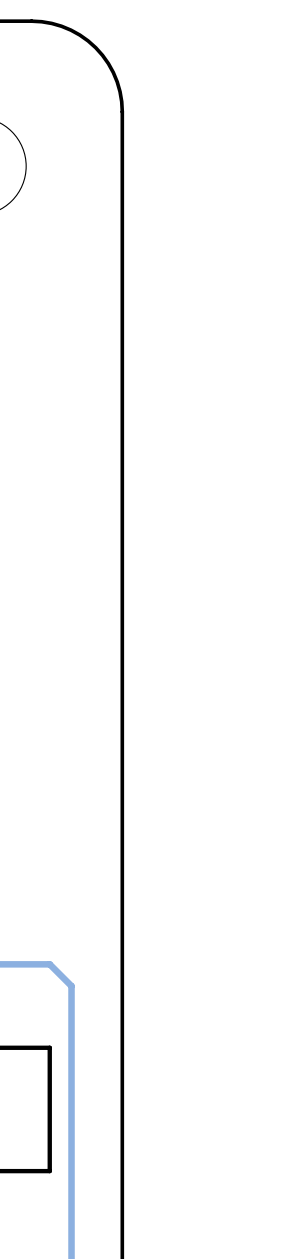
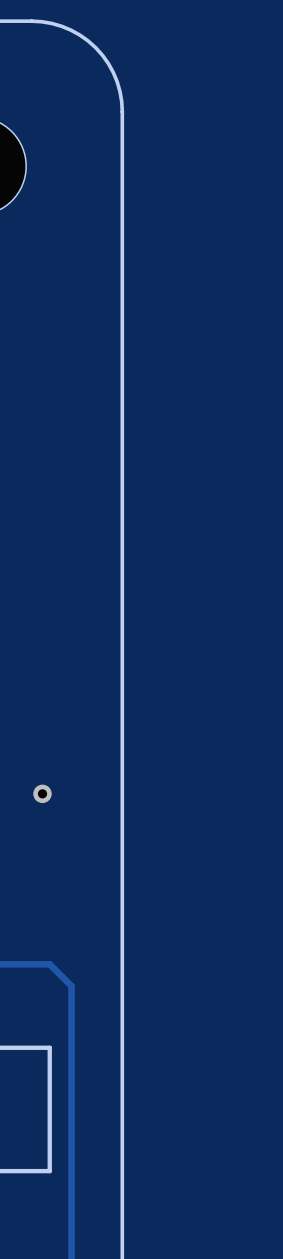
via: none -> (42, 793)

